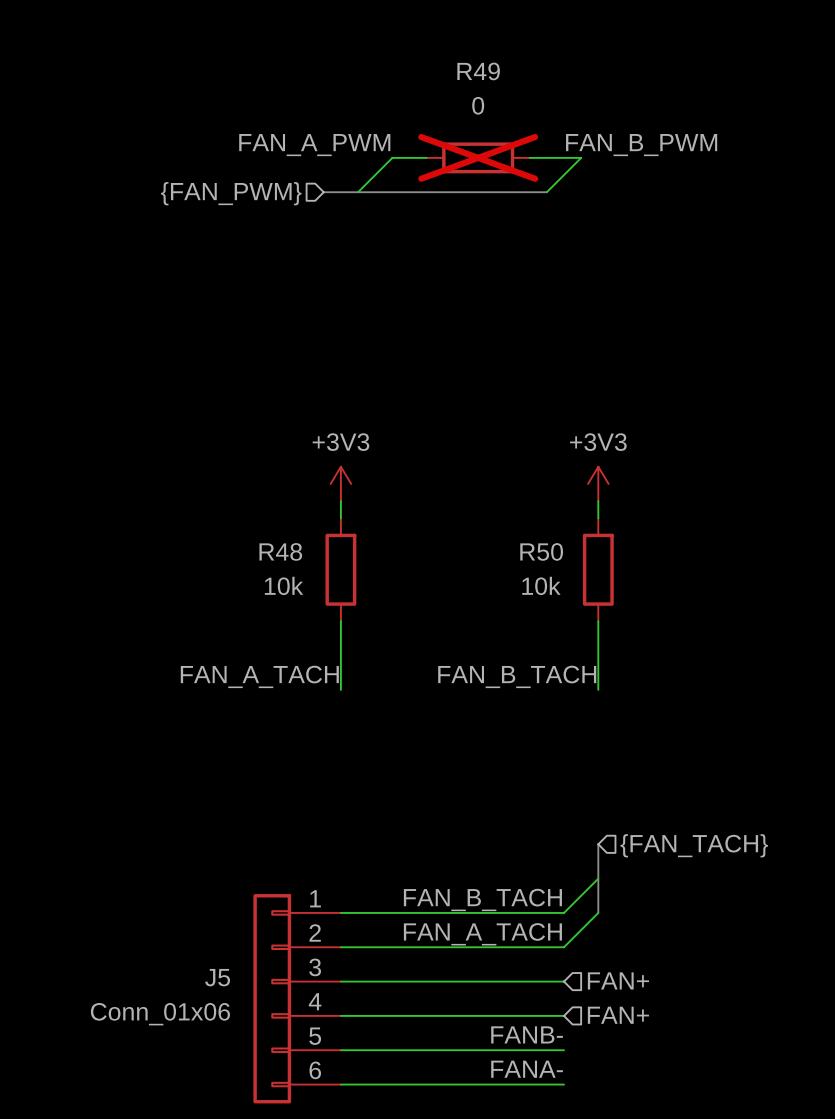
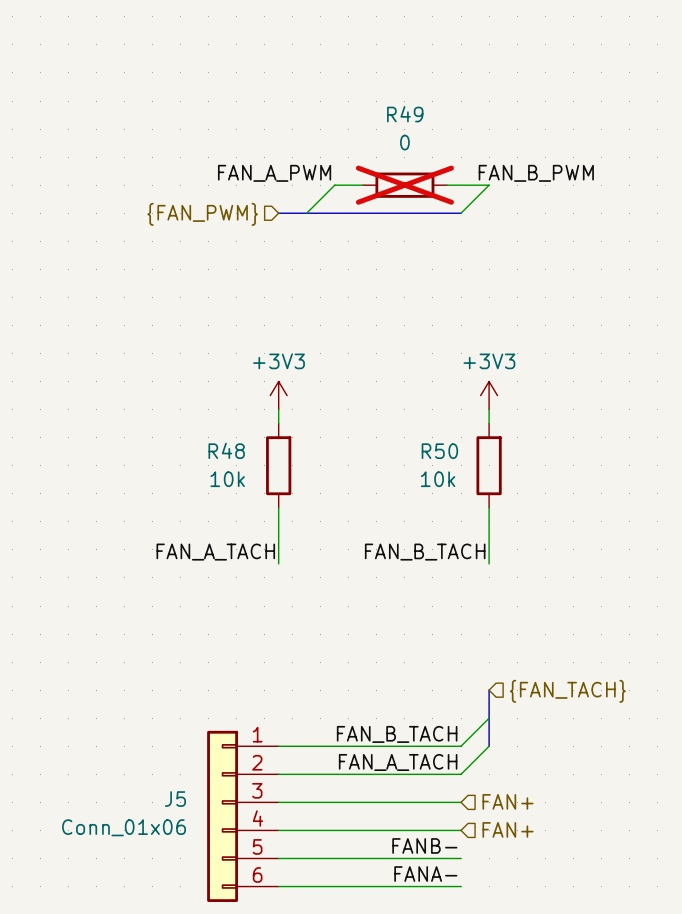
label position: FAN_A_PWM (314, 145) -> FAN_A_PWM (274, 173)
label position: FAN_B_PWM (641, 145) -> FAN_B_PWM (536, 173)
wire: (426, 157) (392, 157) (358, 192) -> (362, 185) (334, 185) (306, 213)
R49 position: (478, 157) -> (404, 185)
wire: (529, 157) (581, 157) (546, 192) -> (447, 185) (489, 185) (461, 213)
bus: (323, 192) (546, 192) -> (278, 213) (461, 213)
hierarchical label position: {FAN_PWM} (231, 193) -> {FAN_PWM} (202, 214)

